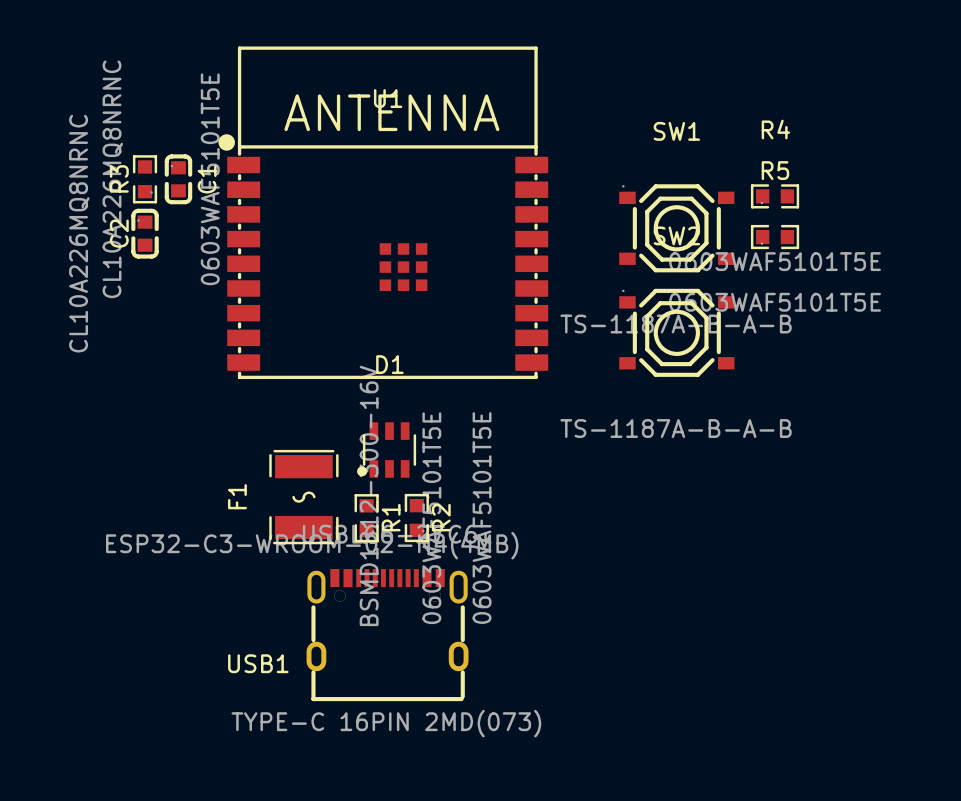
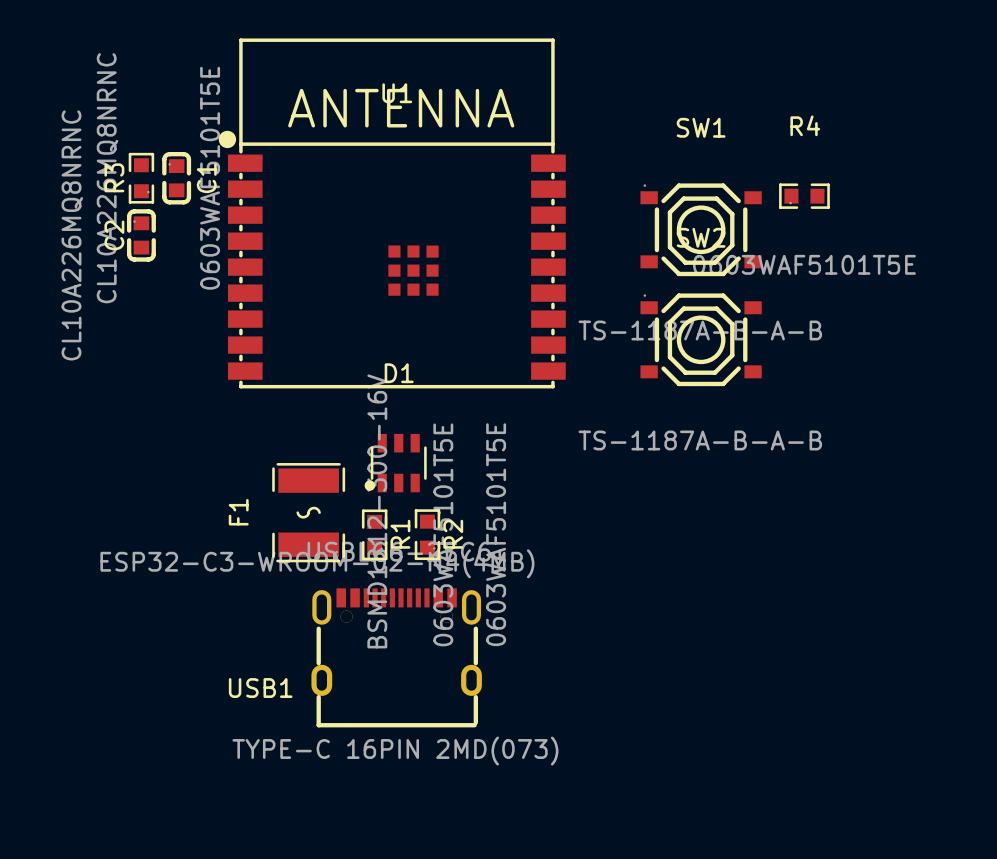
R5: 0603WAF5101T5E (775, 237) -> none

